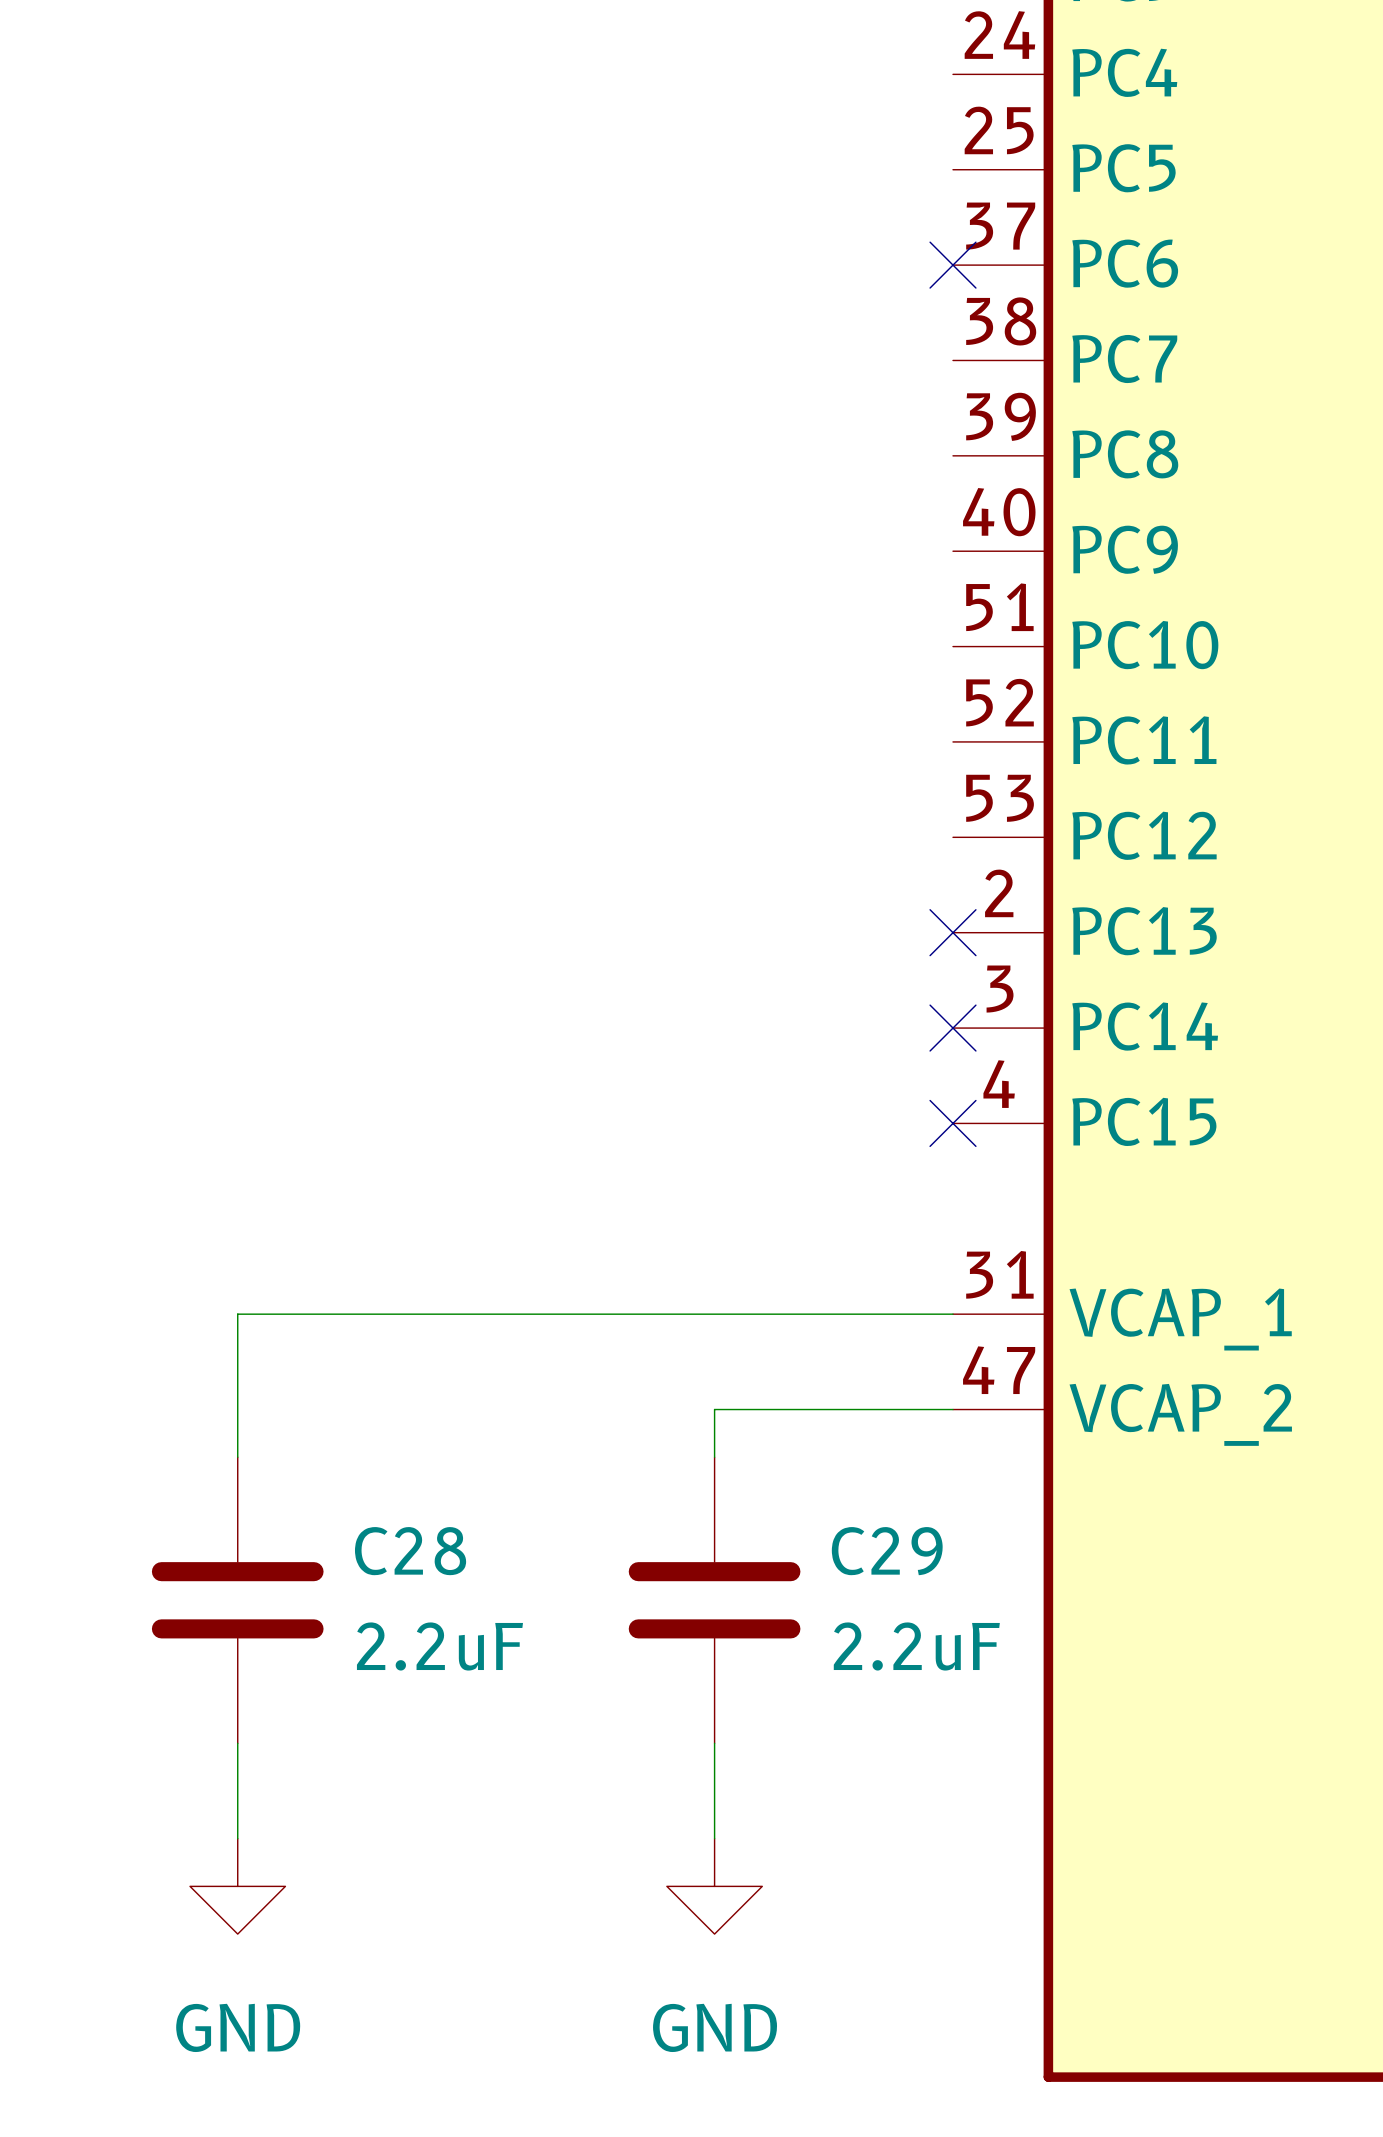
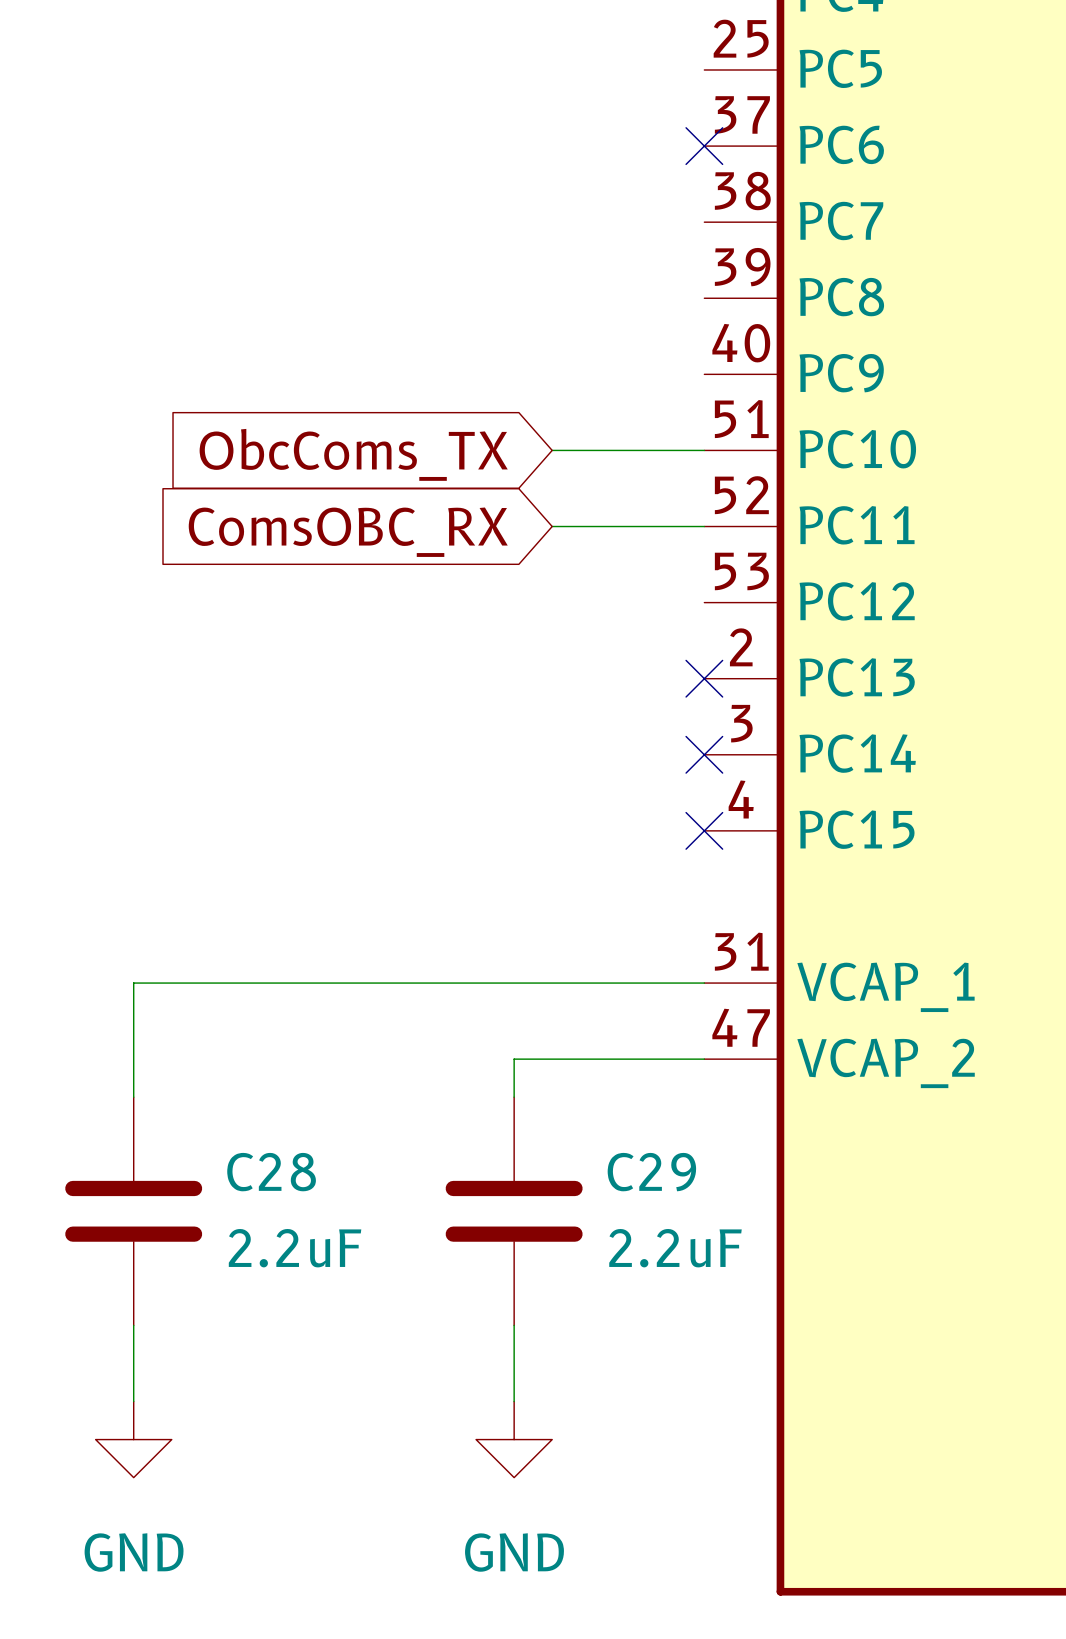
wire: none -> (552, 450) (704, 450)
global label: none -> ObcComs_TX (353, 454)
wire: none -> (552, 526) (704, 526)
global label: none -> ComsOBC_RX (348, 532)

